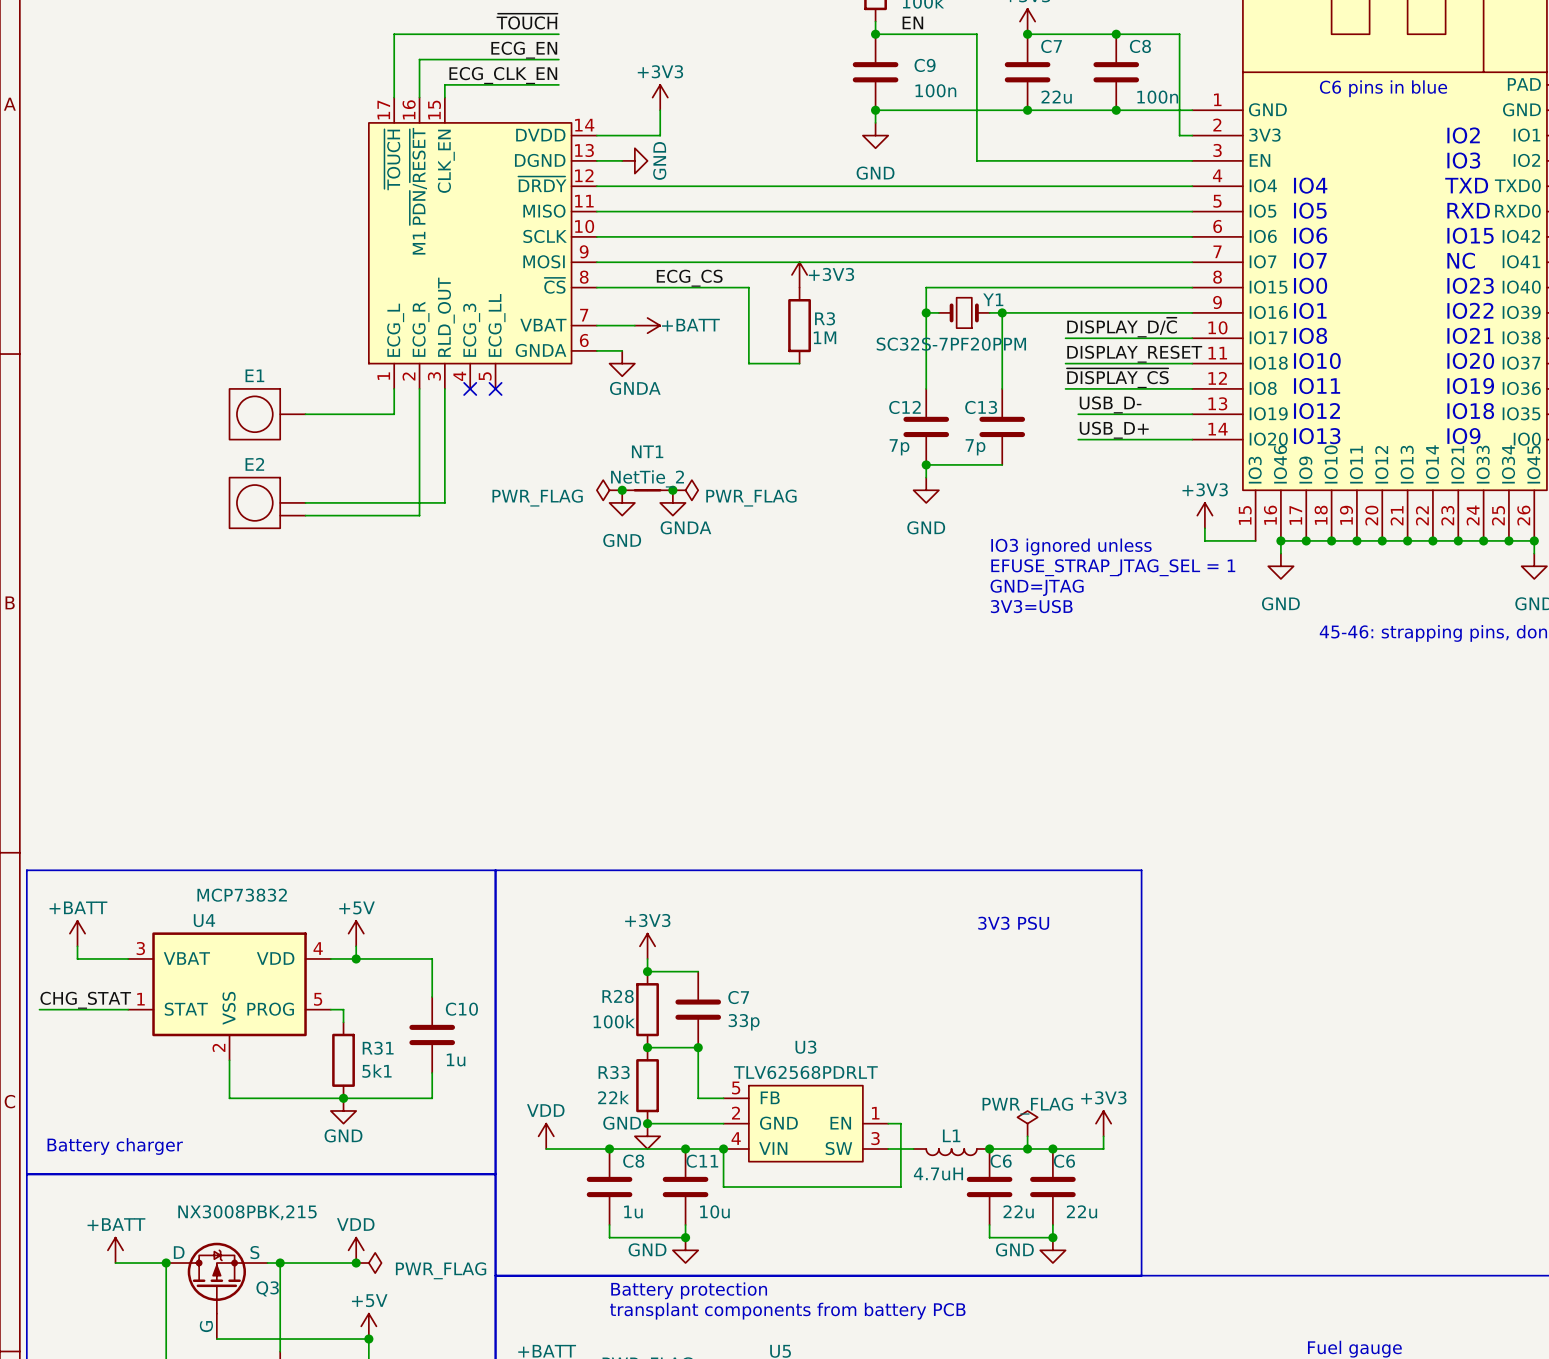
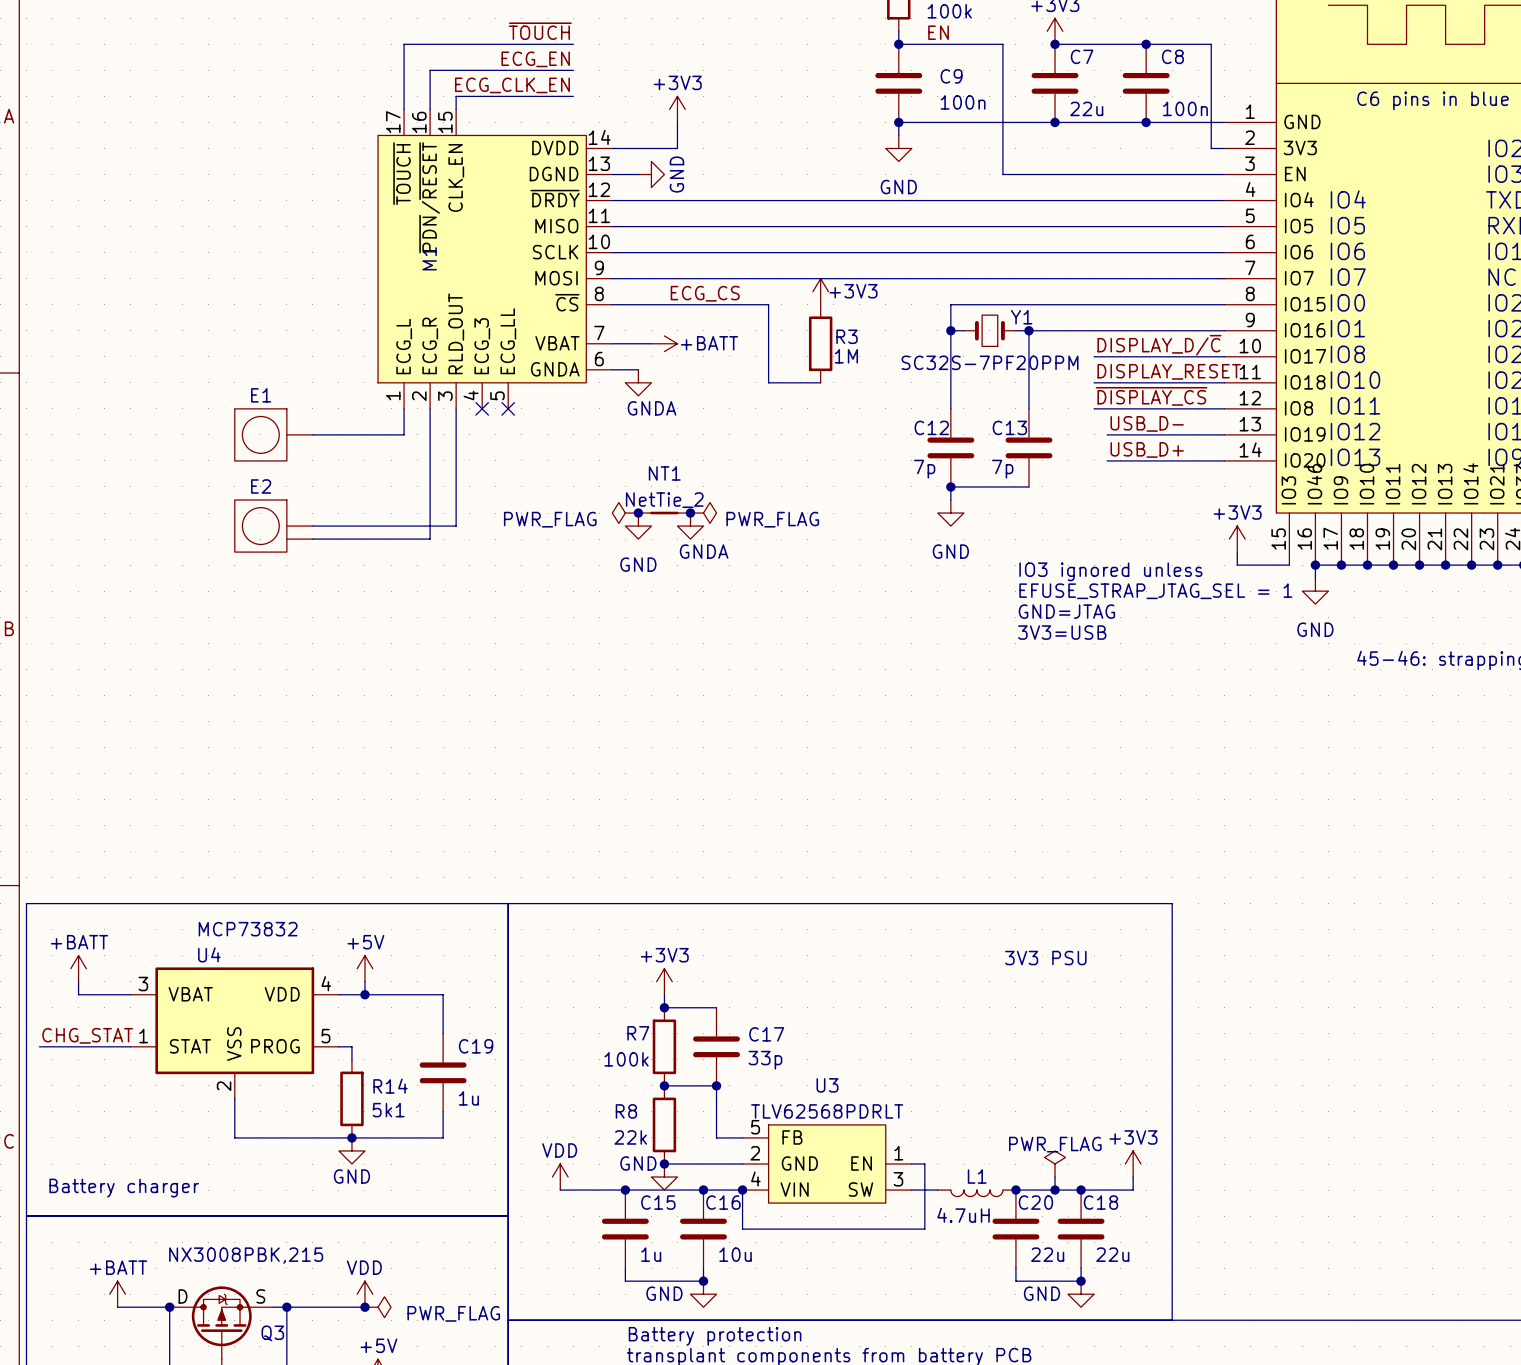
R28 name: R28 (618, 996) -> R7 (638, 1033)
C7 name: C7 (738, 997) -> C17 (766, 1034)
C10 name: C10 (461, 1009) -> C19 (476, 1046)
R31 name: R31 (378, 1048) -> R14 (390, 1086)
R33 name: R33 (614, 1072) -> R8 (626, 1111)
C8 name: C8 (633, 1161) -> C15 (658, 1202)
C11 name: C11 (702, 1161) -> C16 (723, 1202)
C6 name: C6 (1001, 1161) -> C20 (1035, 1202)
C6 name: C6 (1064, 1161) -> C18 (1100, 1202)

